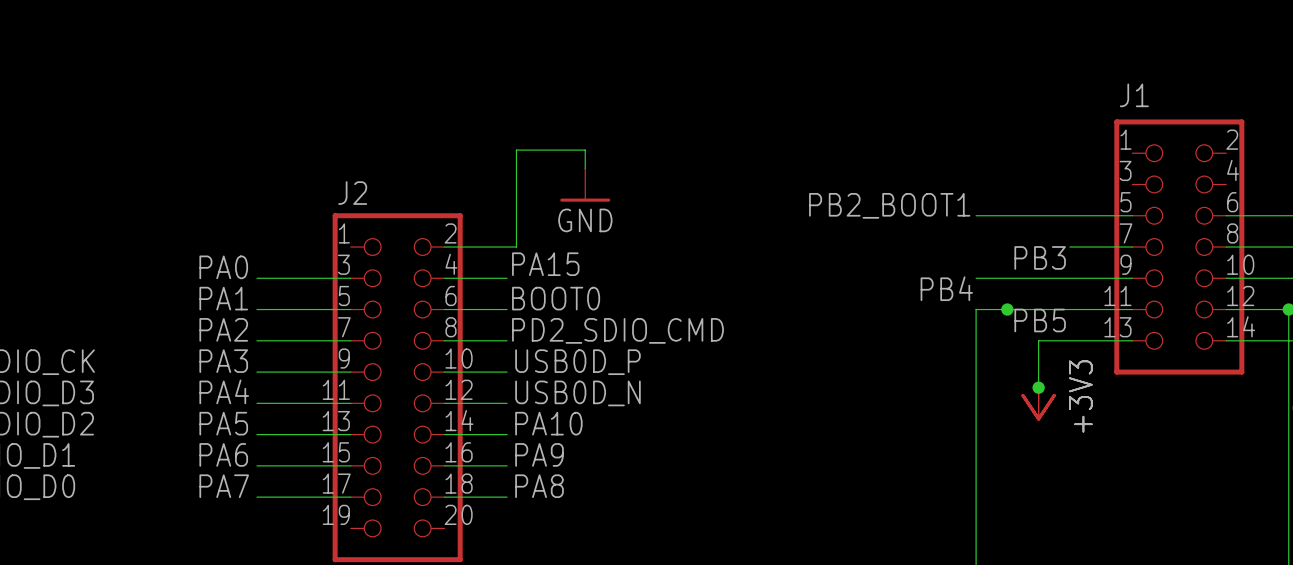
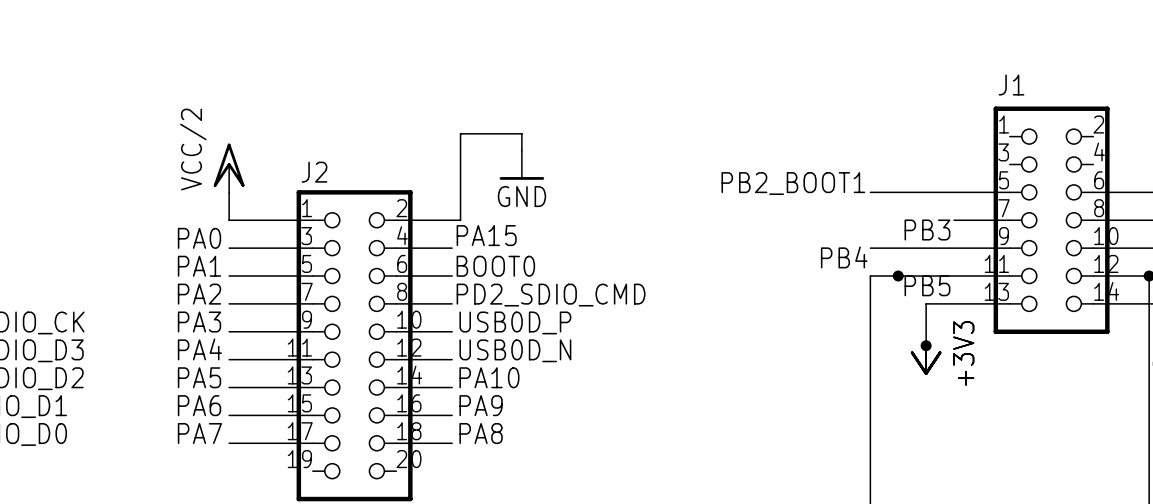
power symbol: none -> VCC/2 (229, 167)
wire: none -> (229, 192) (229, 220) (312, 220)

